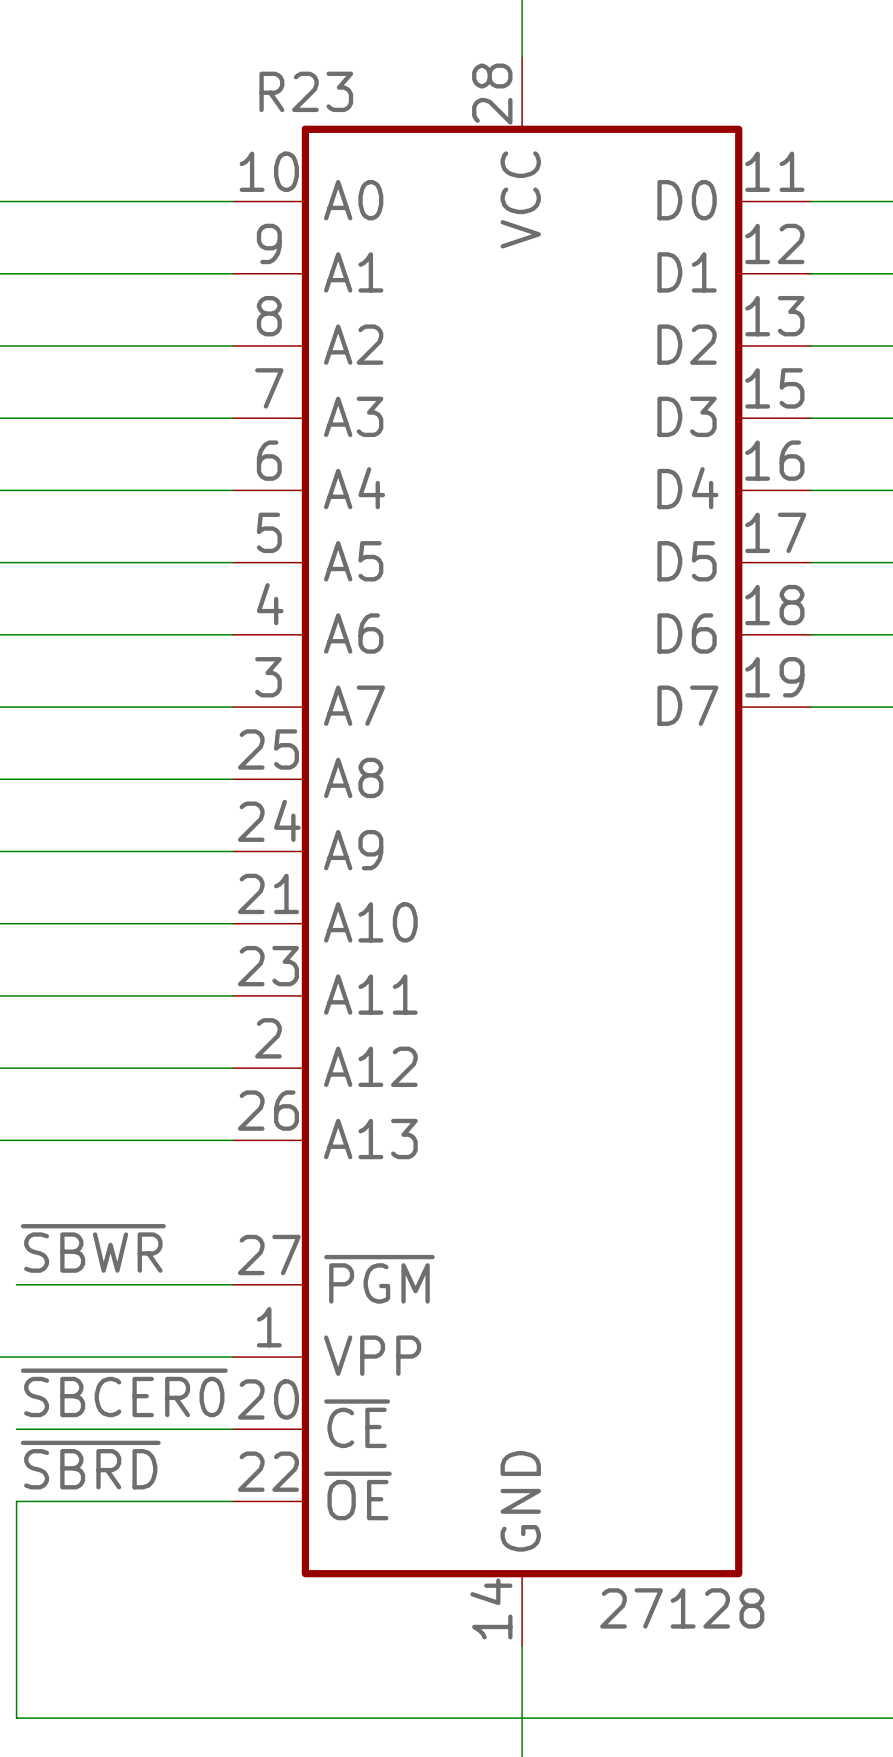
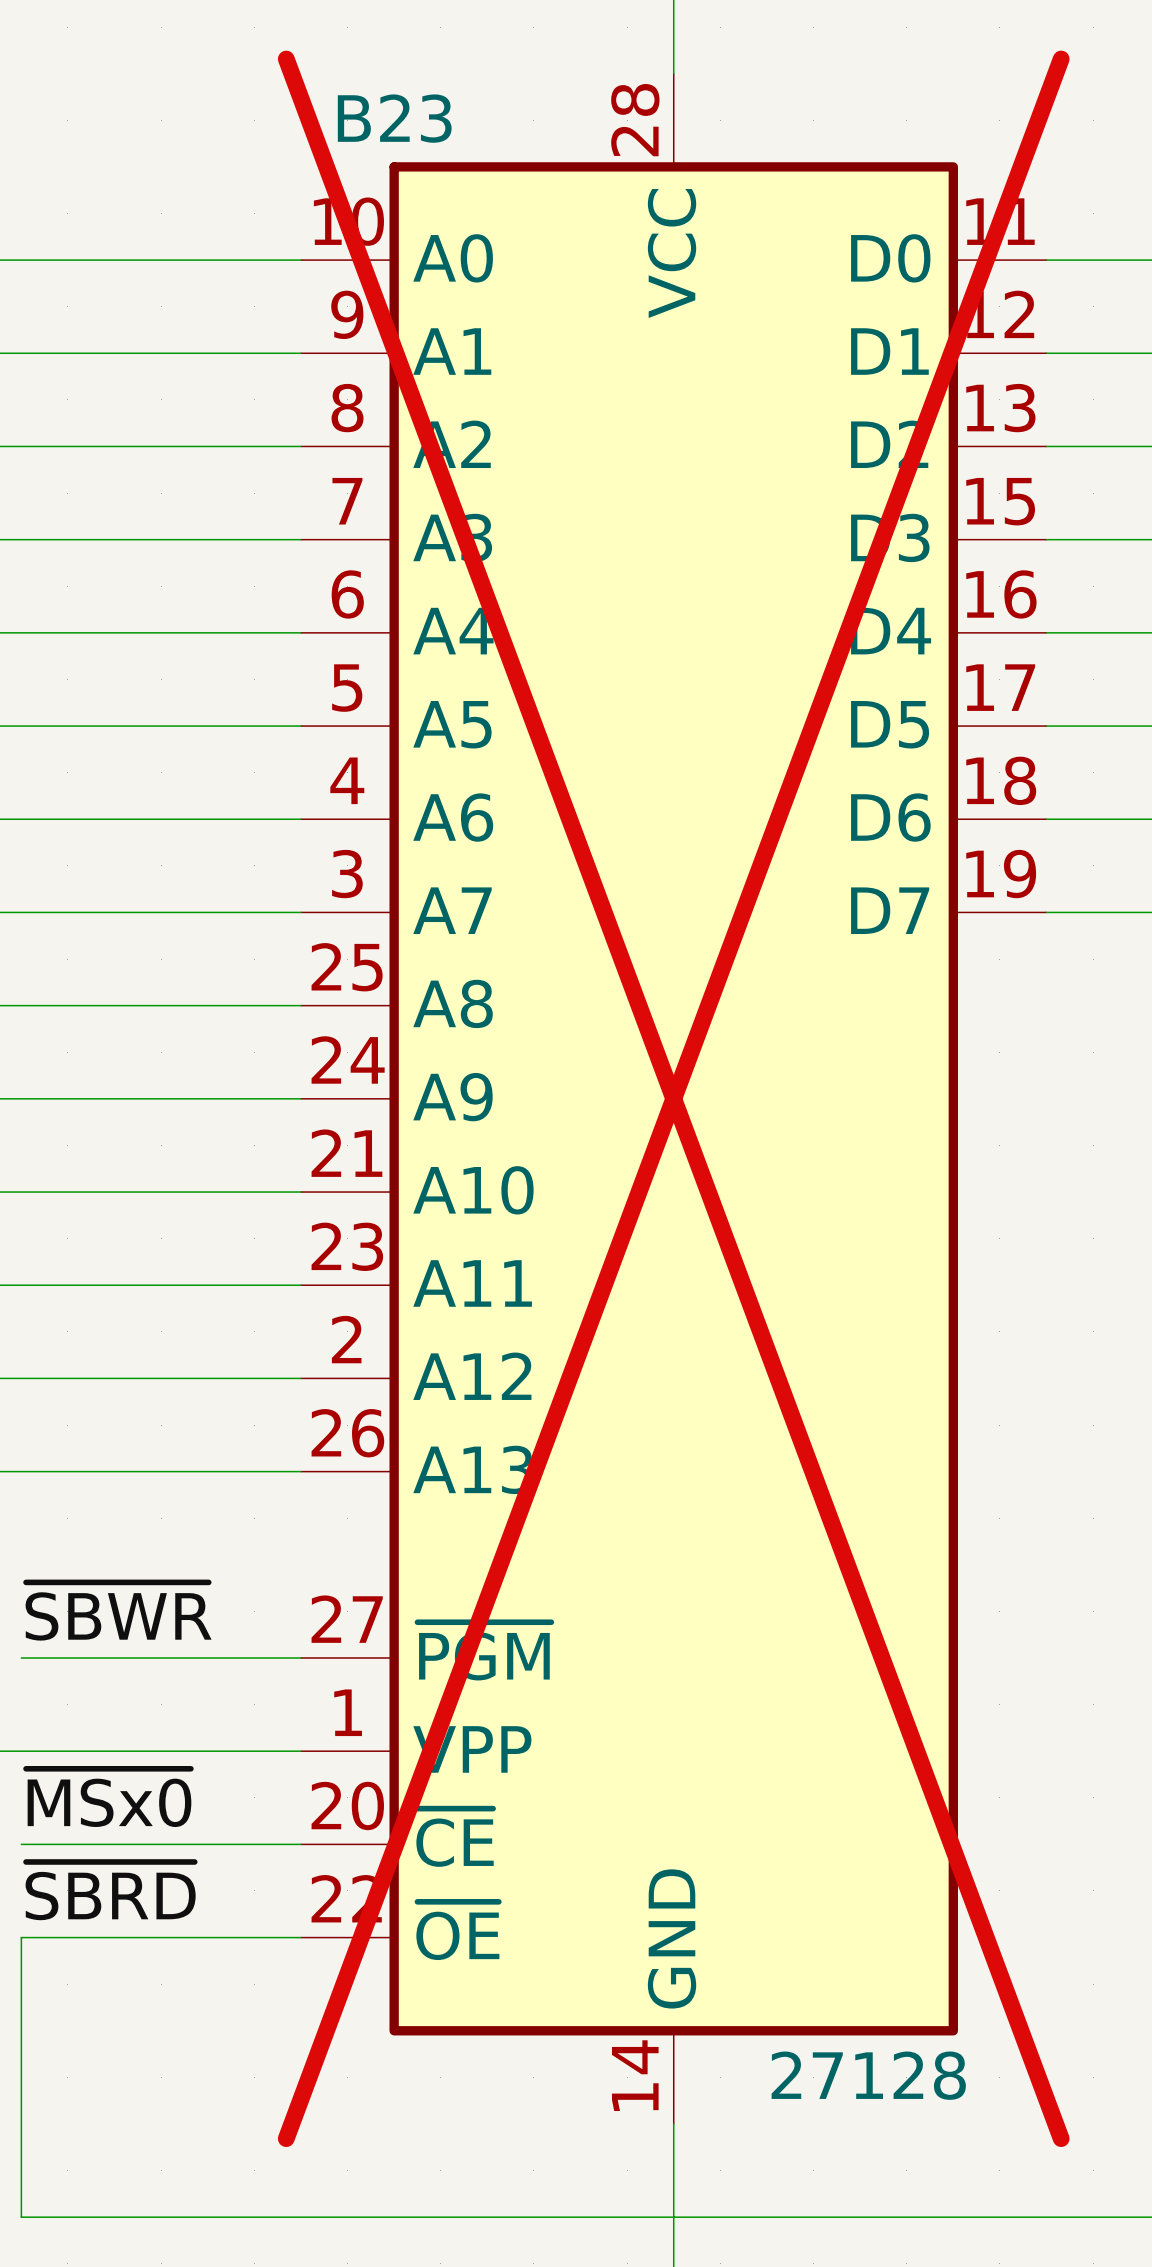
R23 name: R23 (306, 91) -> B23 (394, 118)
R23 do-not-place cross: none -> (673, 1098)
label: ~{SBCER0} (124, 1392) -> ~{MSx0} (108, 1797)

